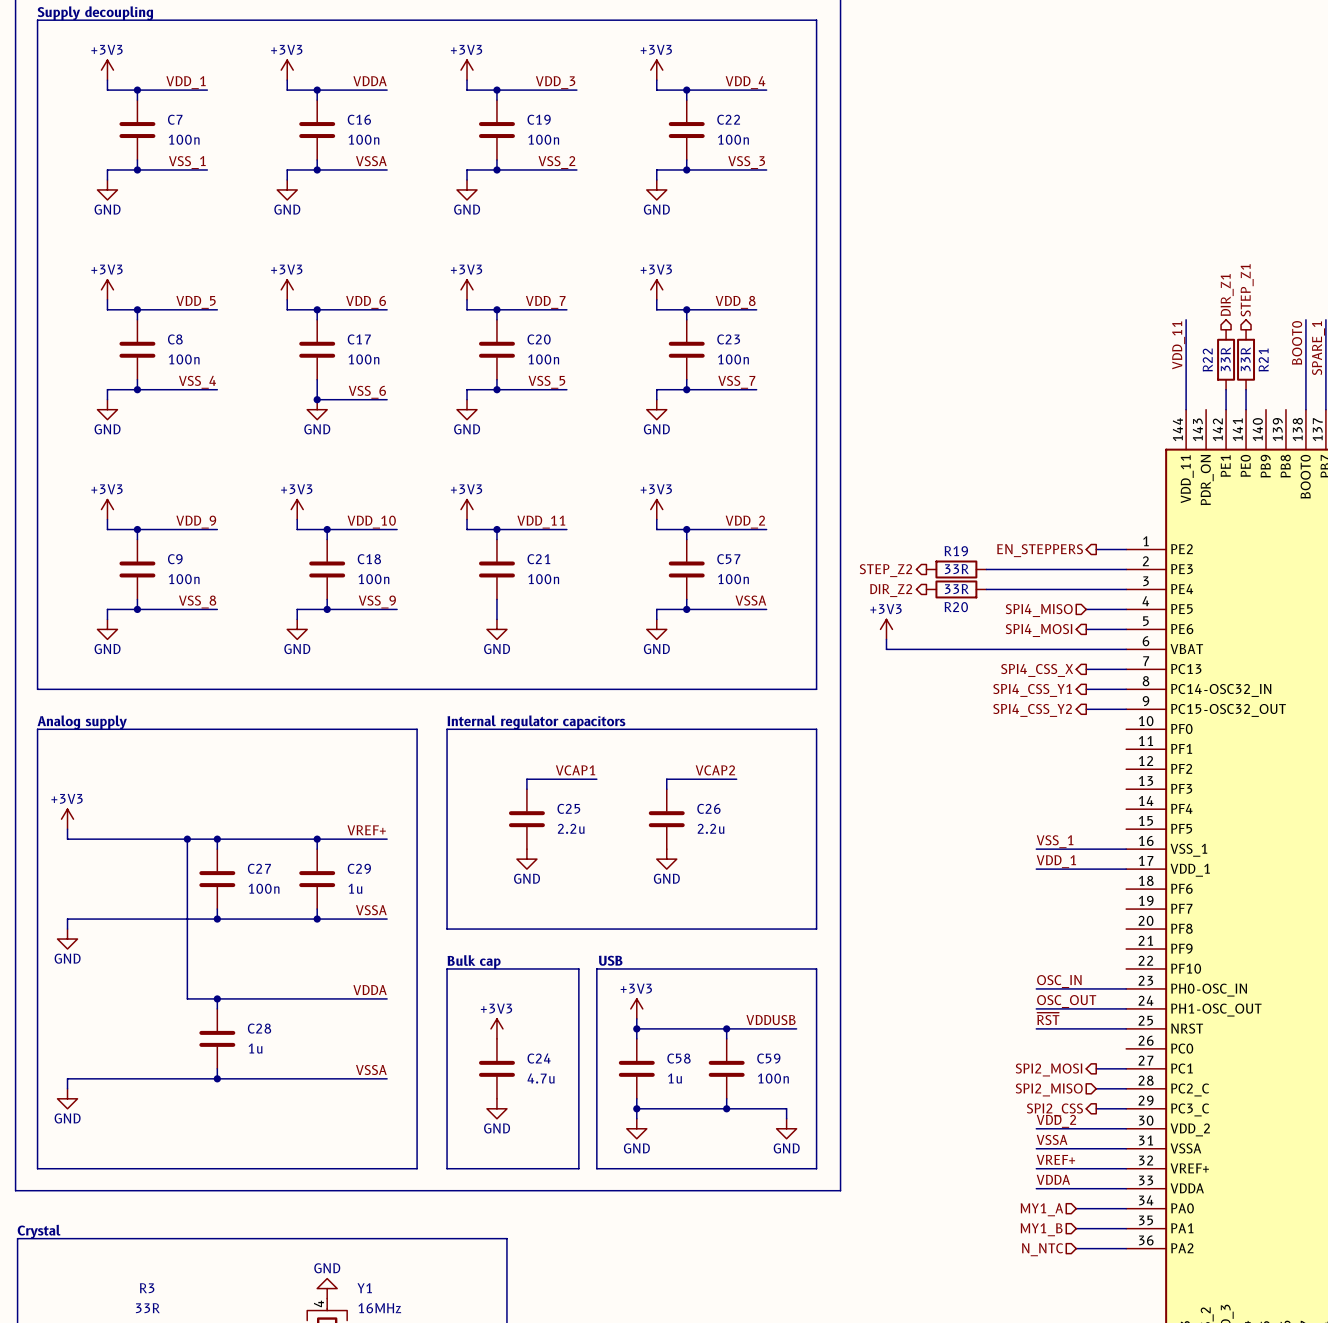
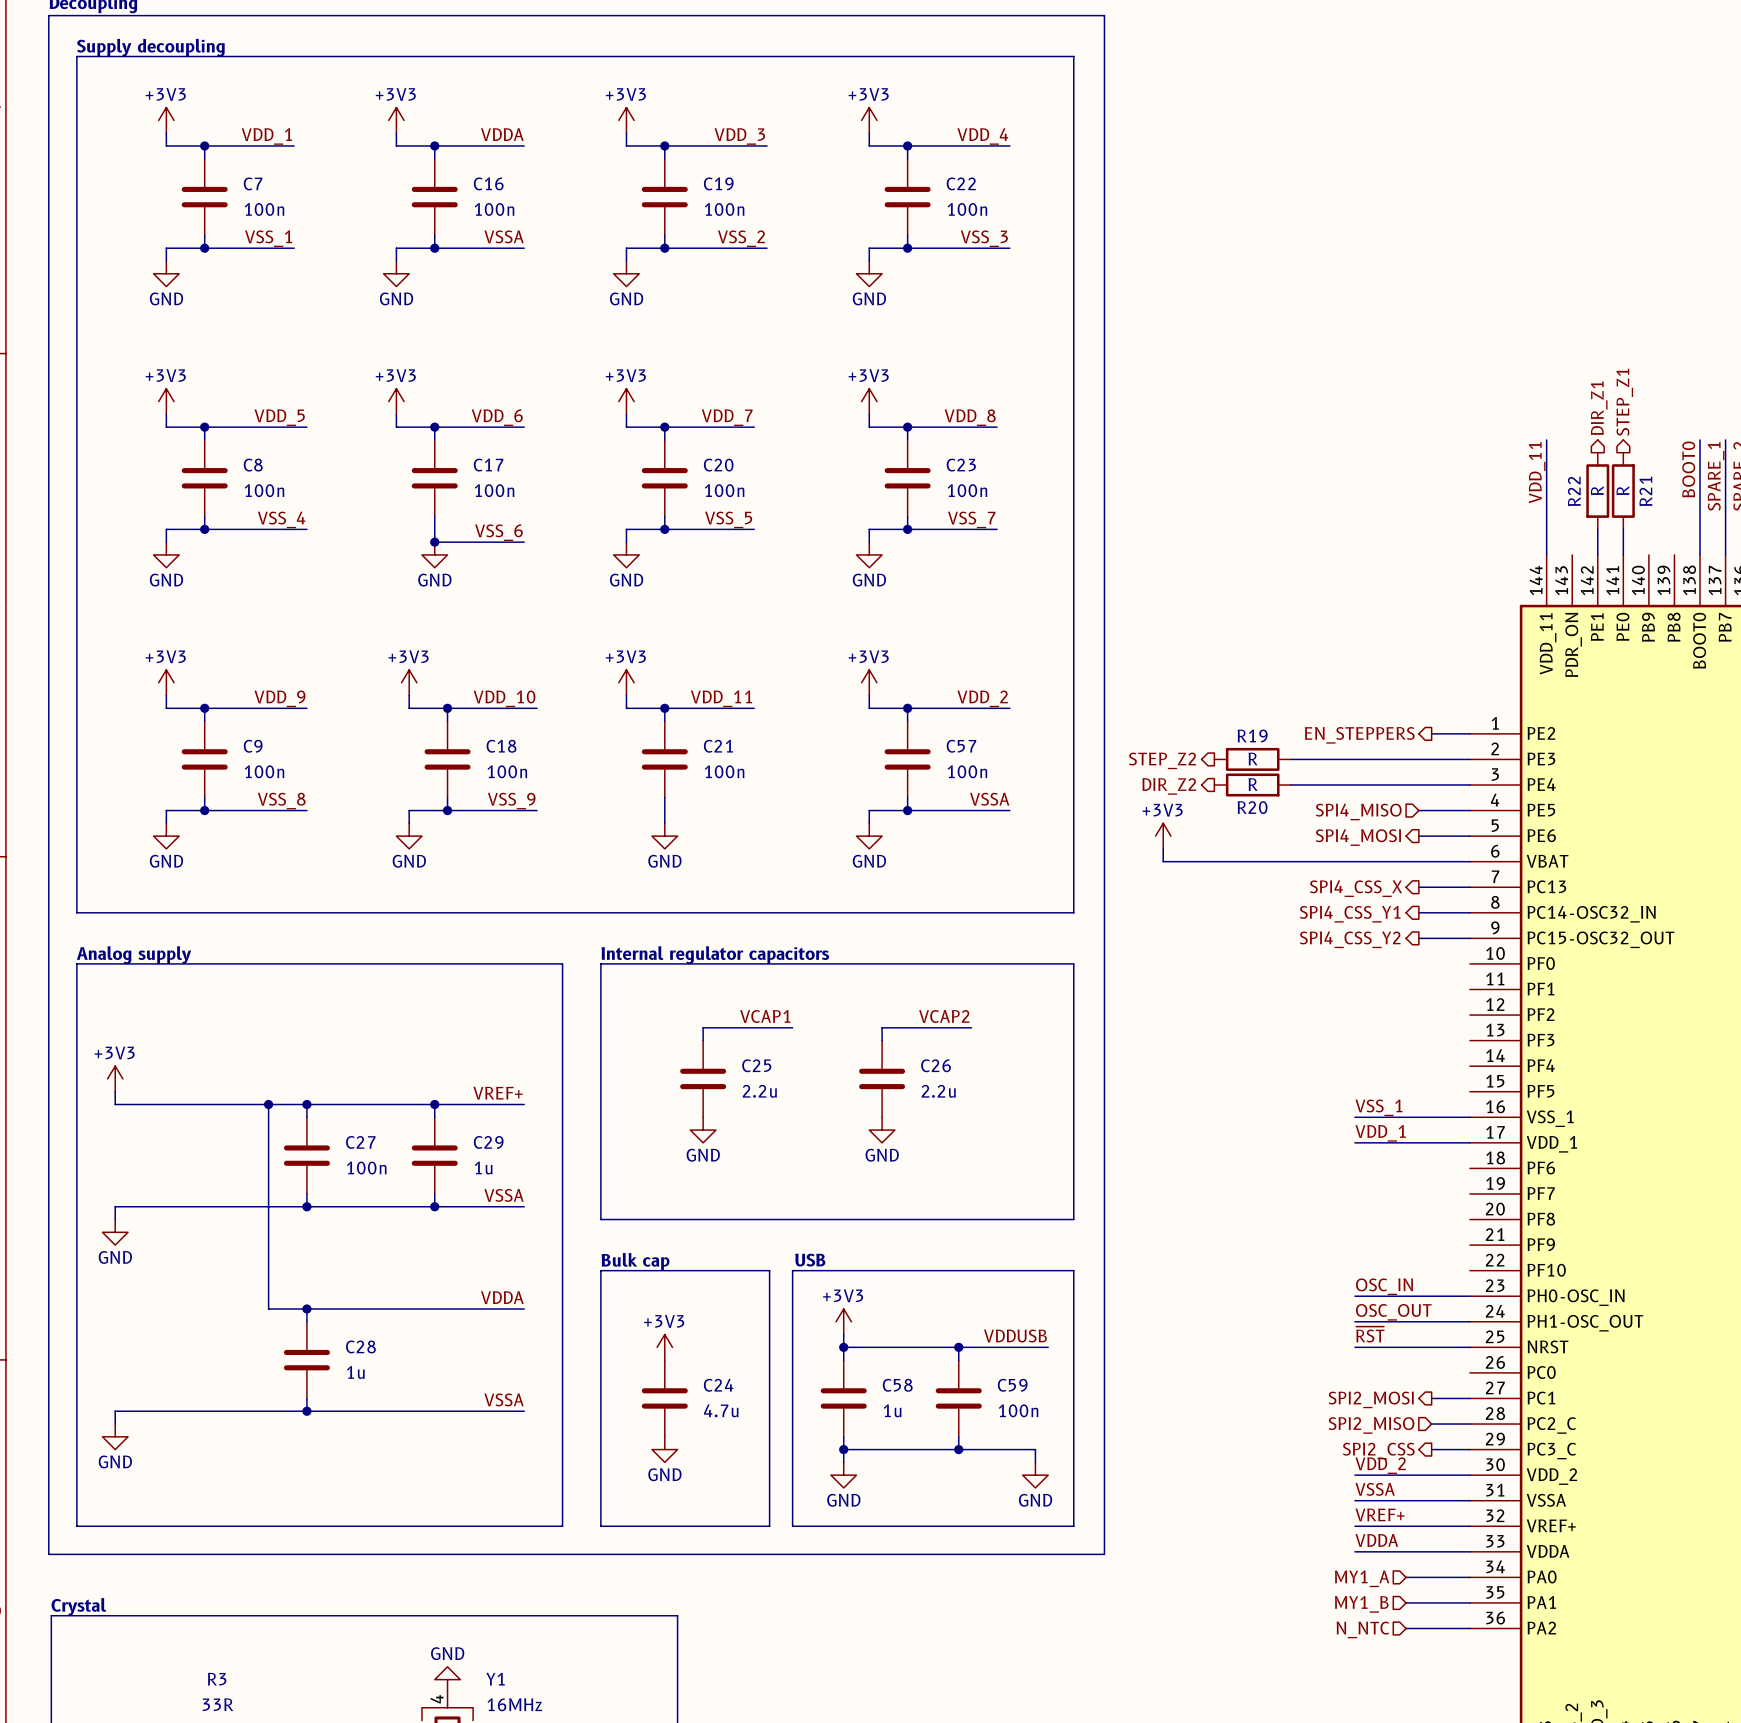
R22 value: 33R (1225, 359) -> R (1597, 490)
R21 value: 33R (1245, 359) -> R (1622, 490)
R19 value: 33R (956, 569) -> R (1253, 758)
R20 value: 33R (956, 589) -> R (1253, 784)

